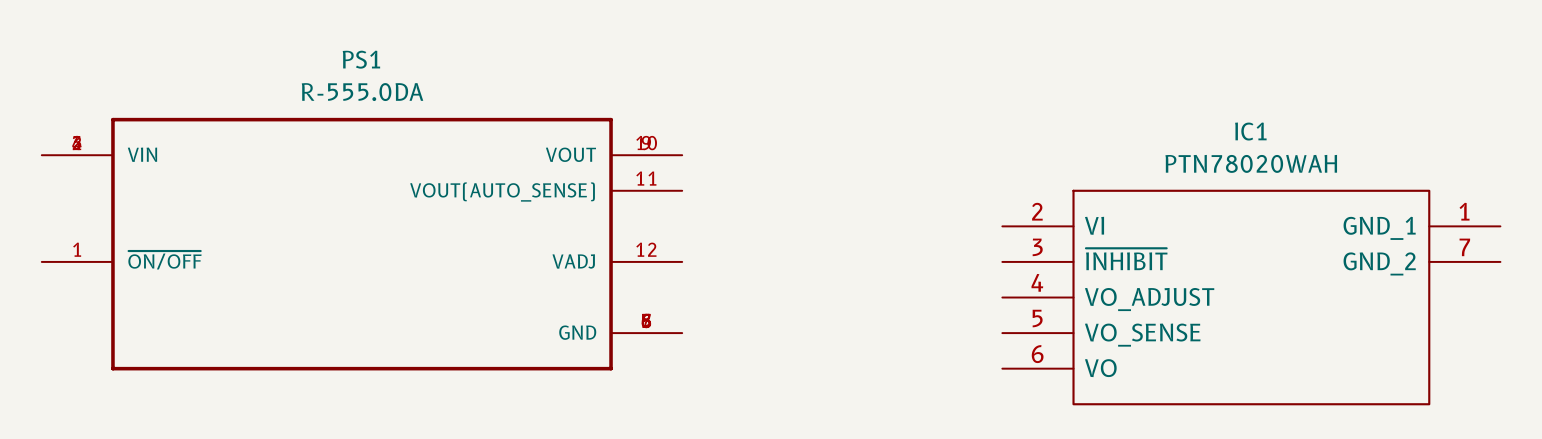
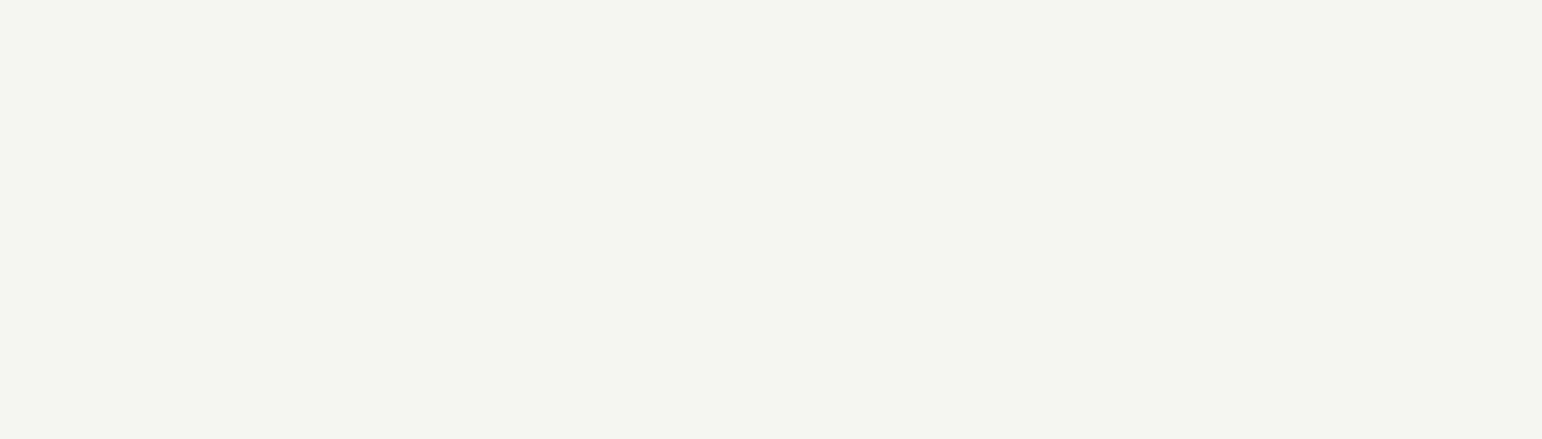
PS1: R-555.0DA (361, 244) -> none
IC1: PTN78020WAH (1251, 297) -> none

